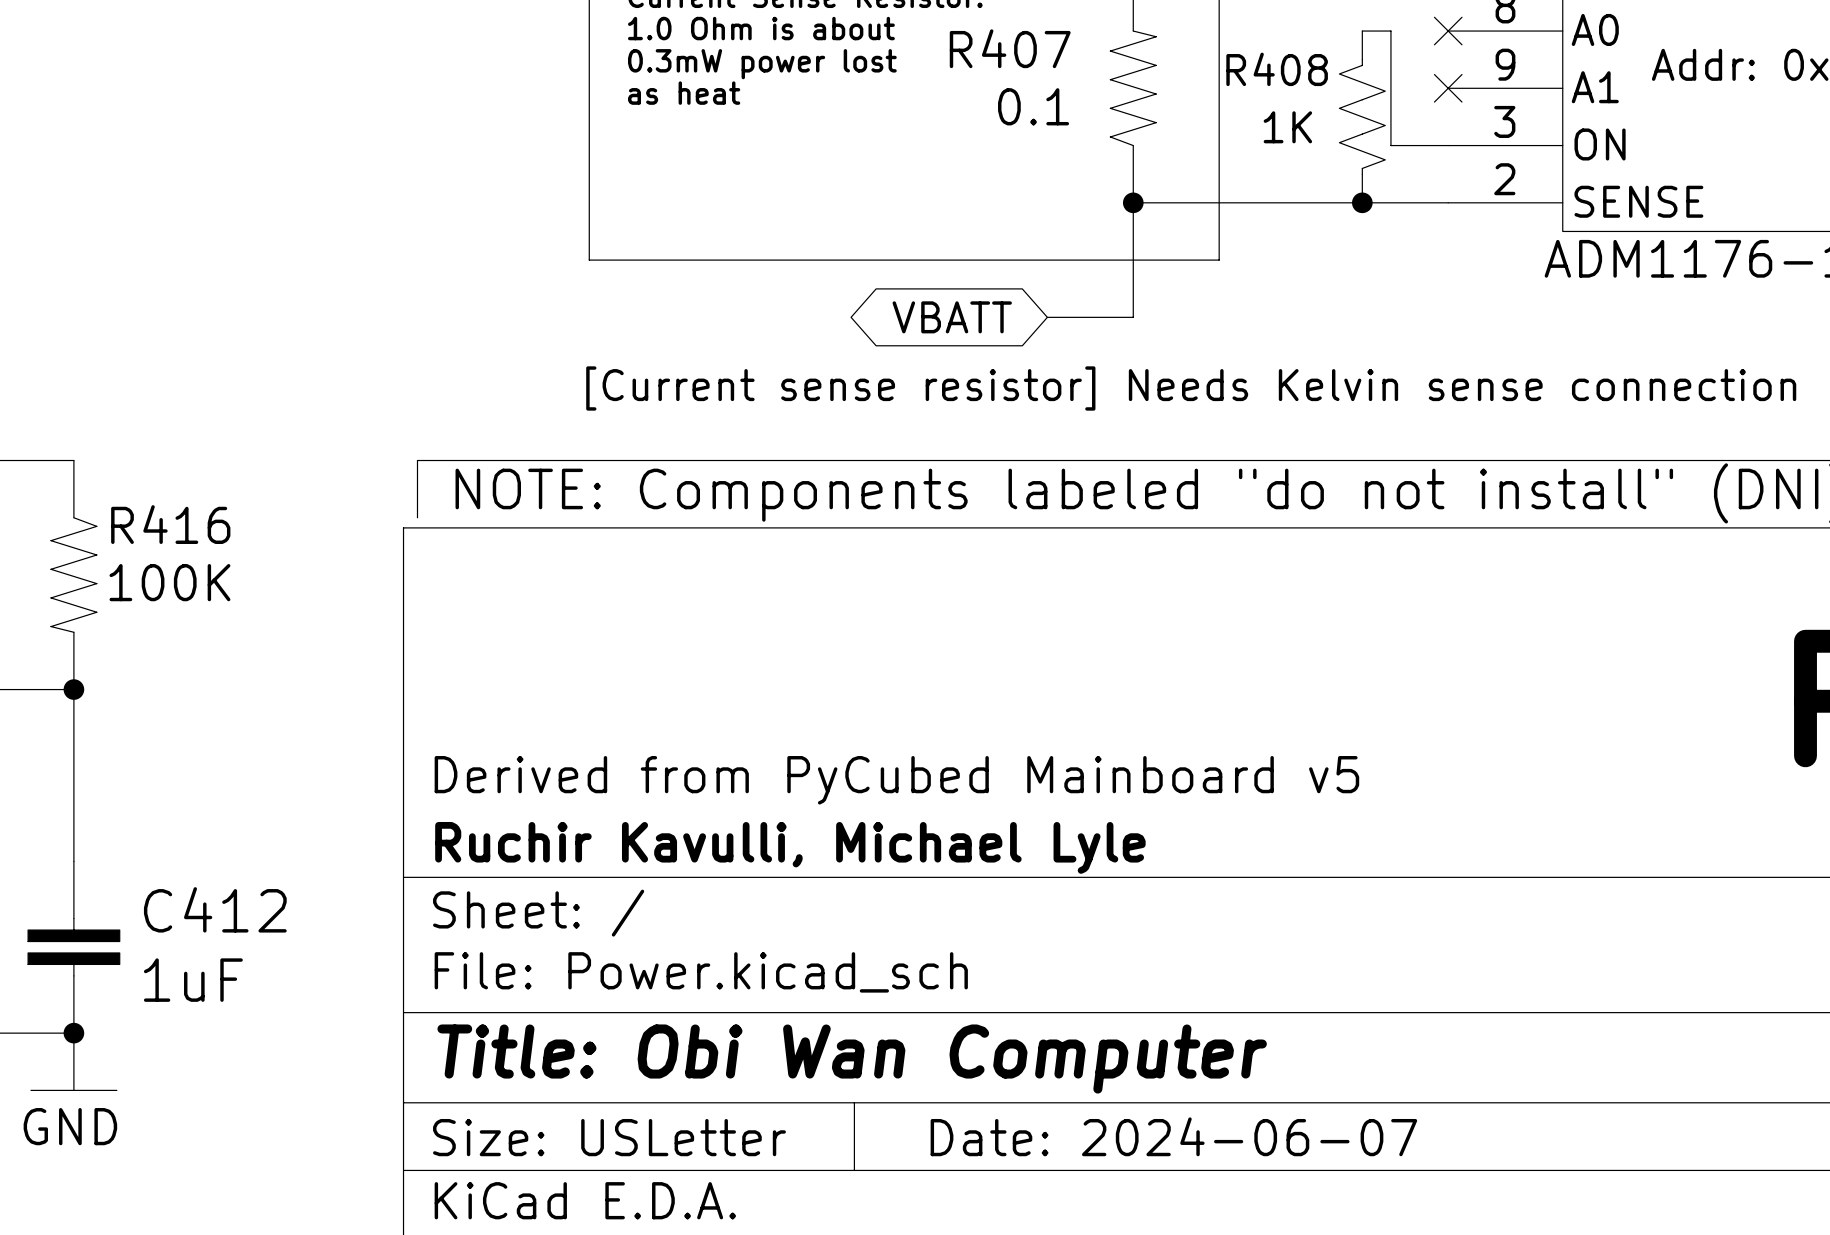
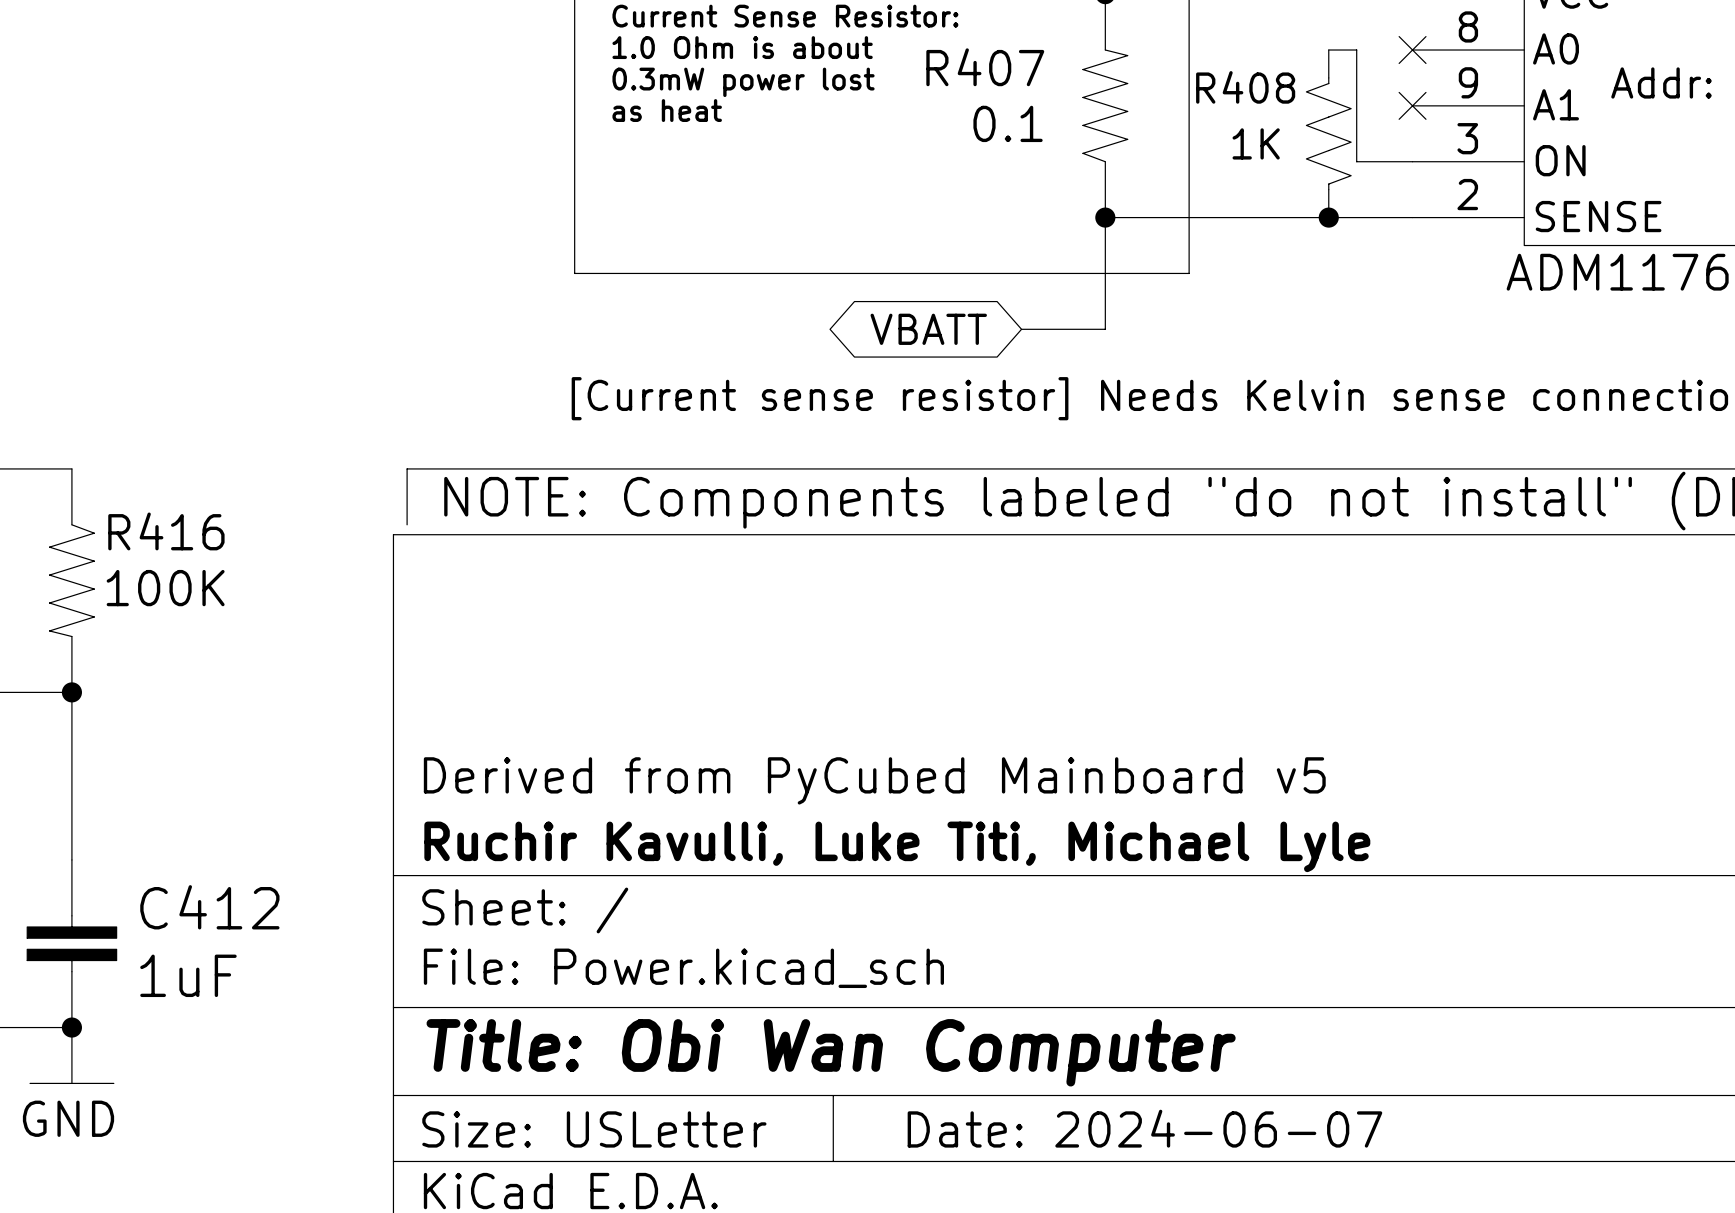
title block: Ruchir Kavulli, Michael Lyle (790, 847) -> Ruchir Kavulli, Luke Titi, Michael Lyle (897, 846)

